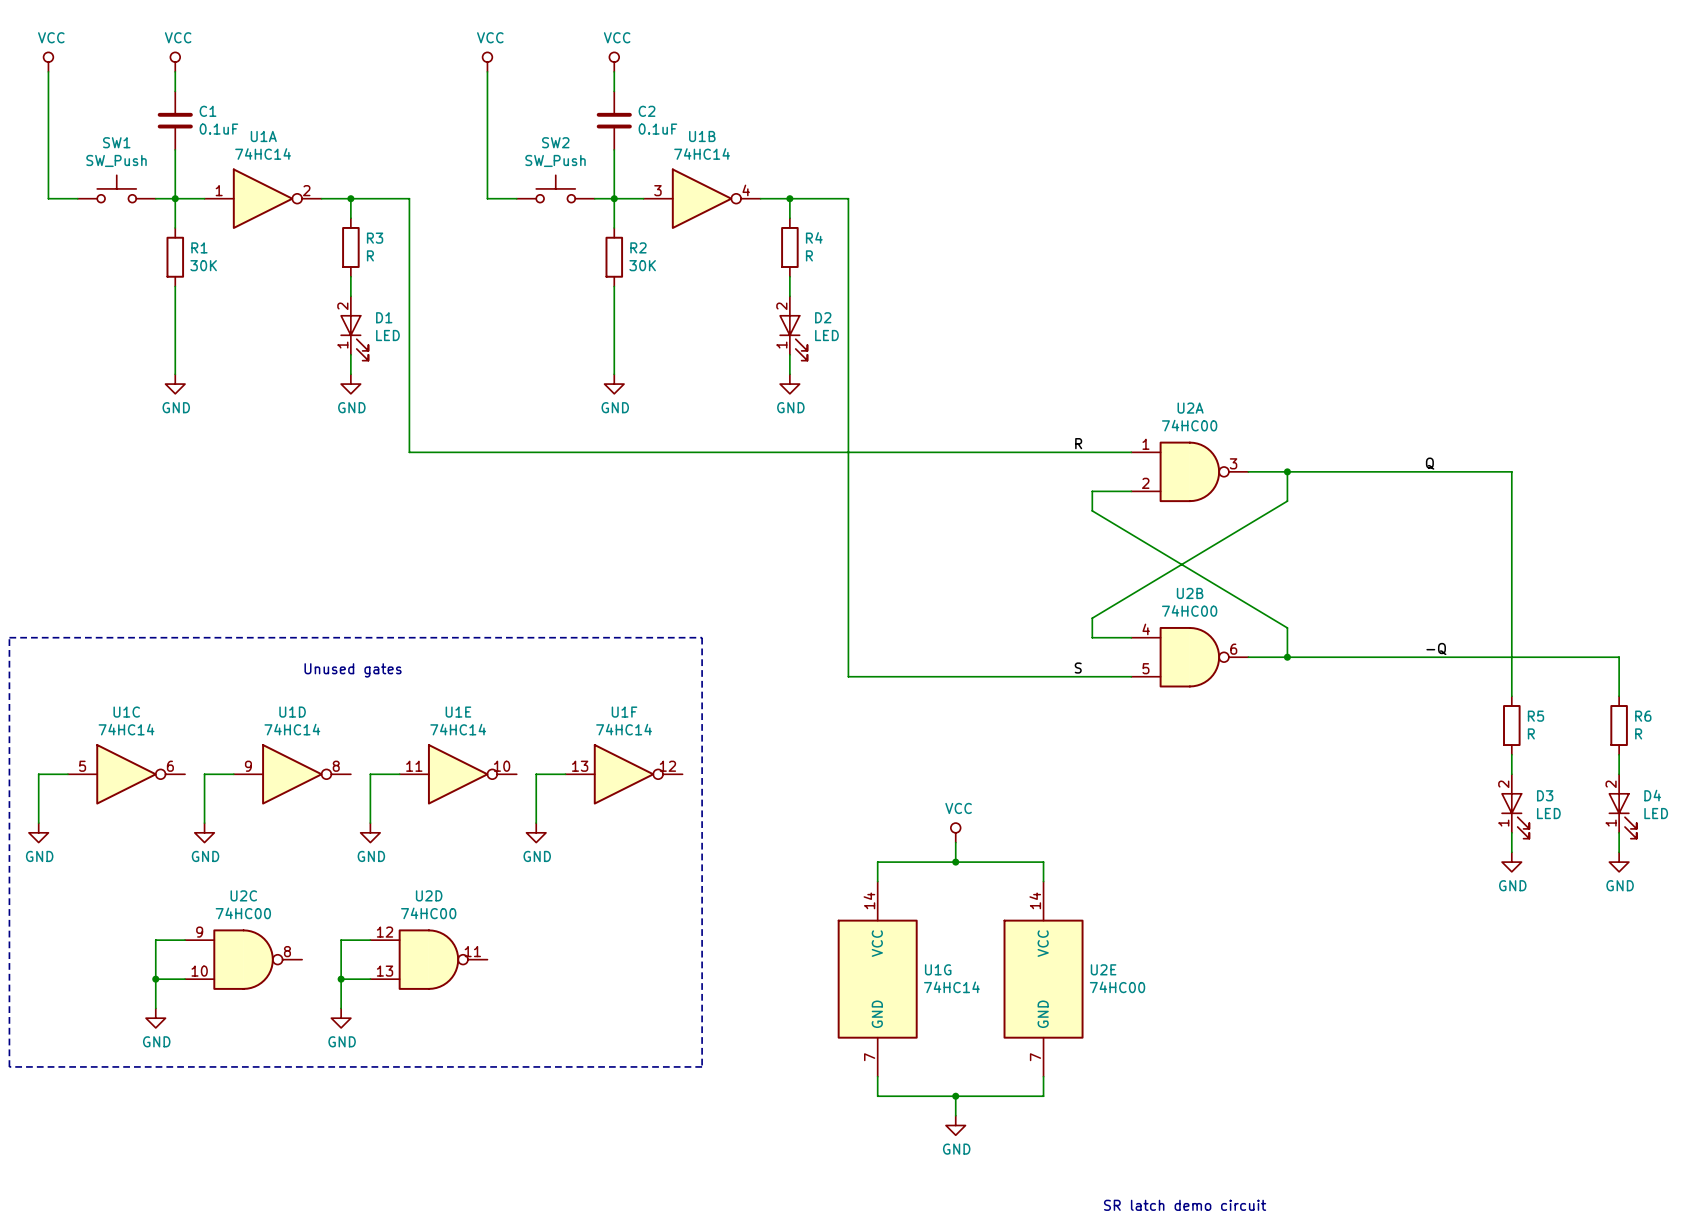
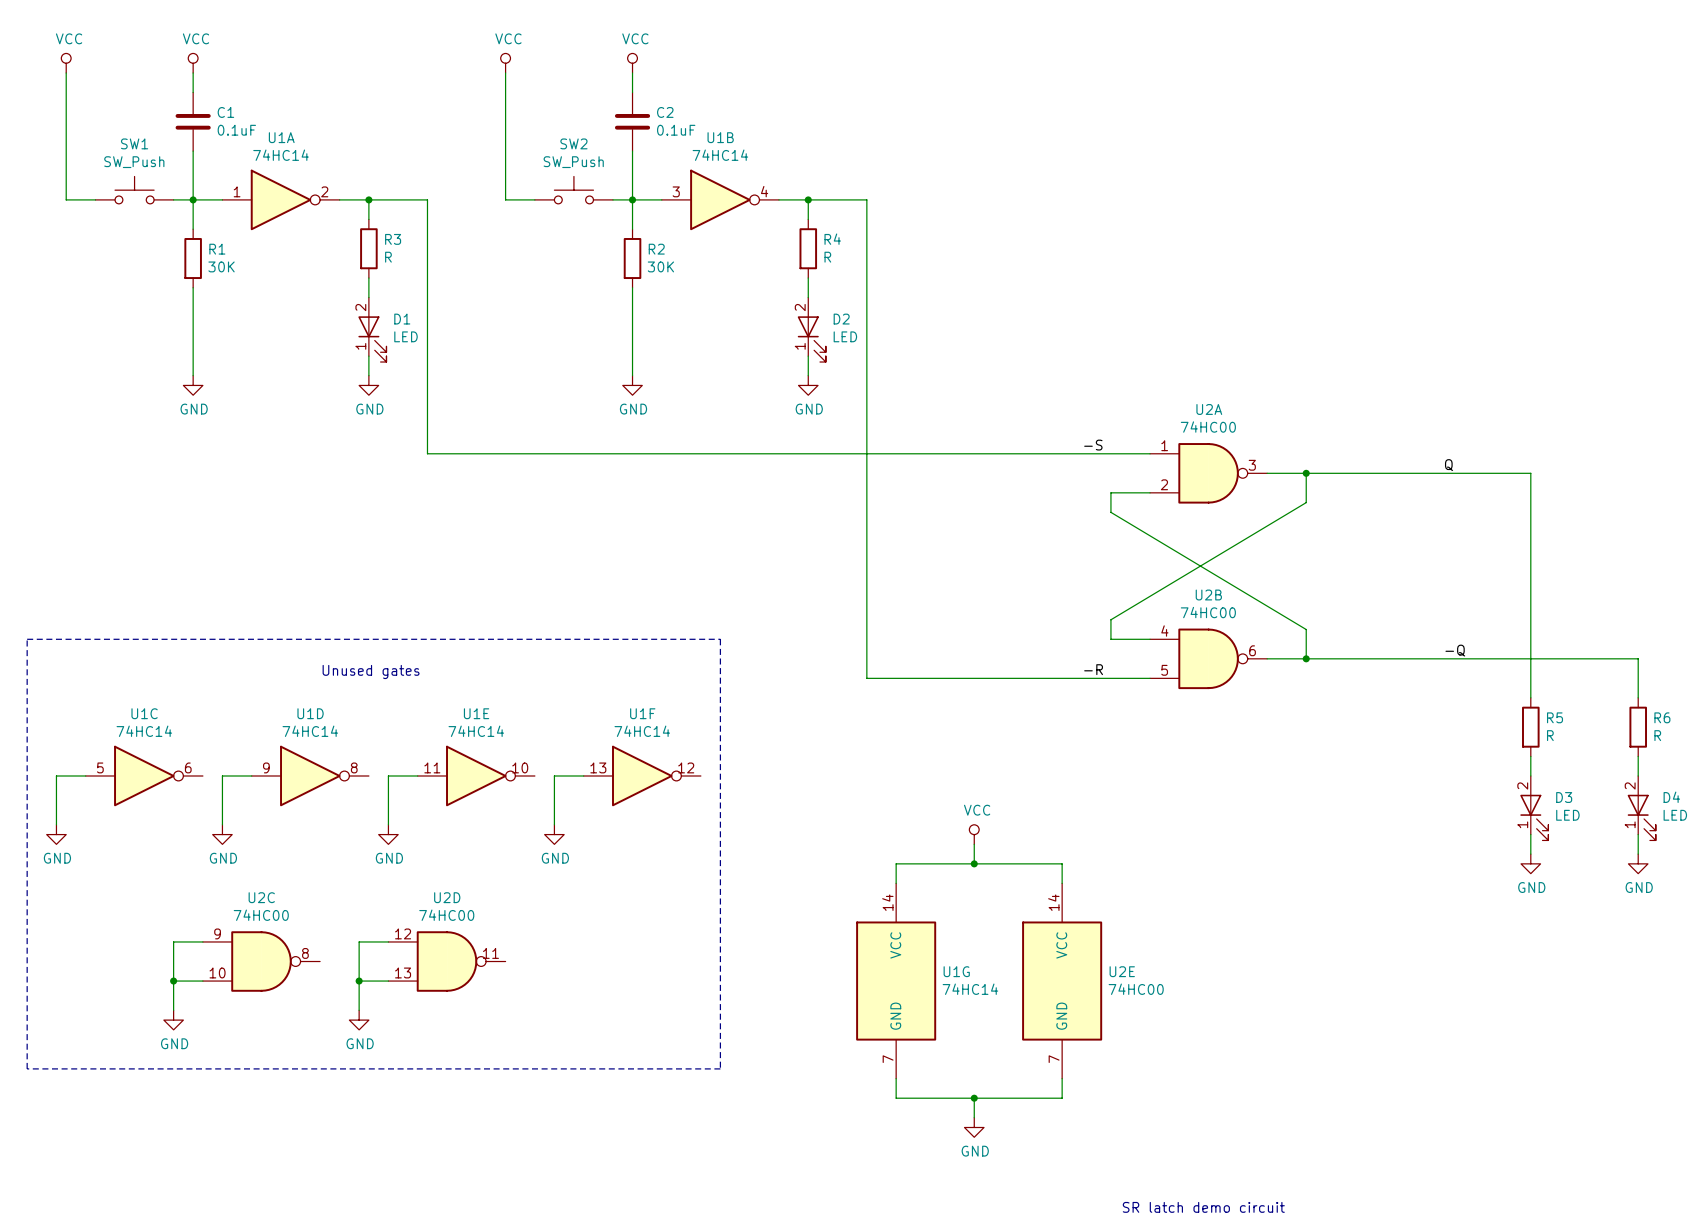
label: none -> -S (1093, 445)
label: R (1078, 443) -> none
label: none -> -R (1093, 669)
label: S (1078, 668) -> none

